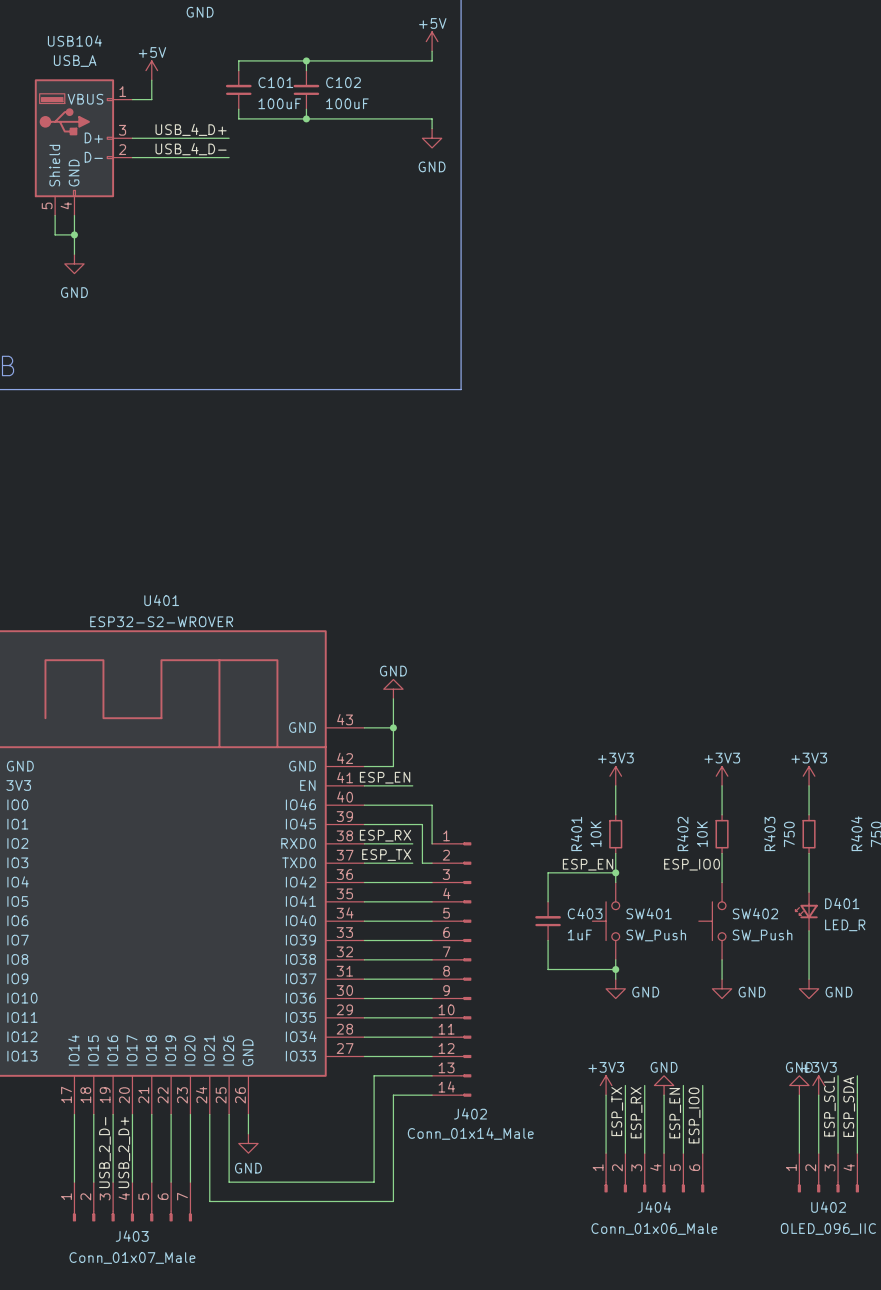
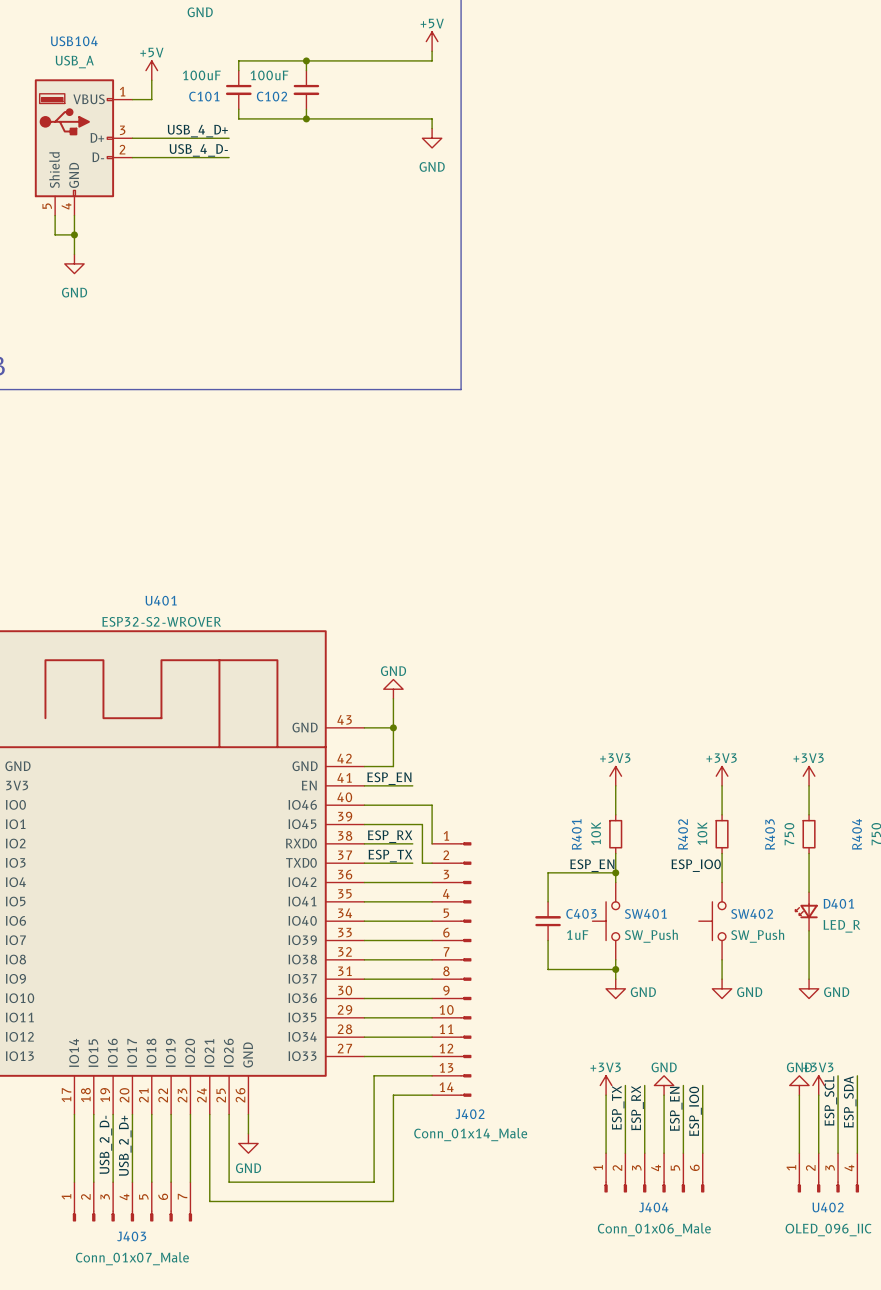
C101 rotation: 0° (238, 89) -> 180° (238, 89)
C102 rotation: 0° (306, 89) -> 180° (306, 89)

